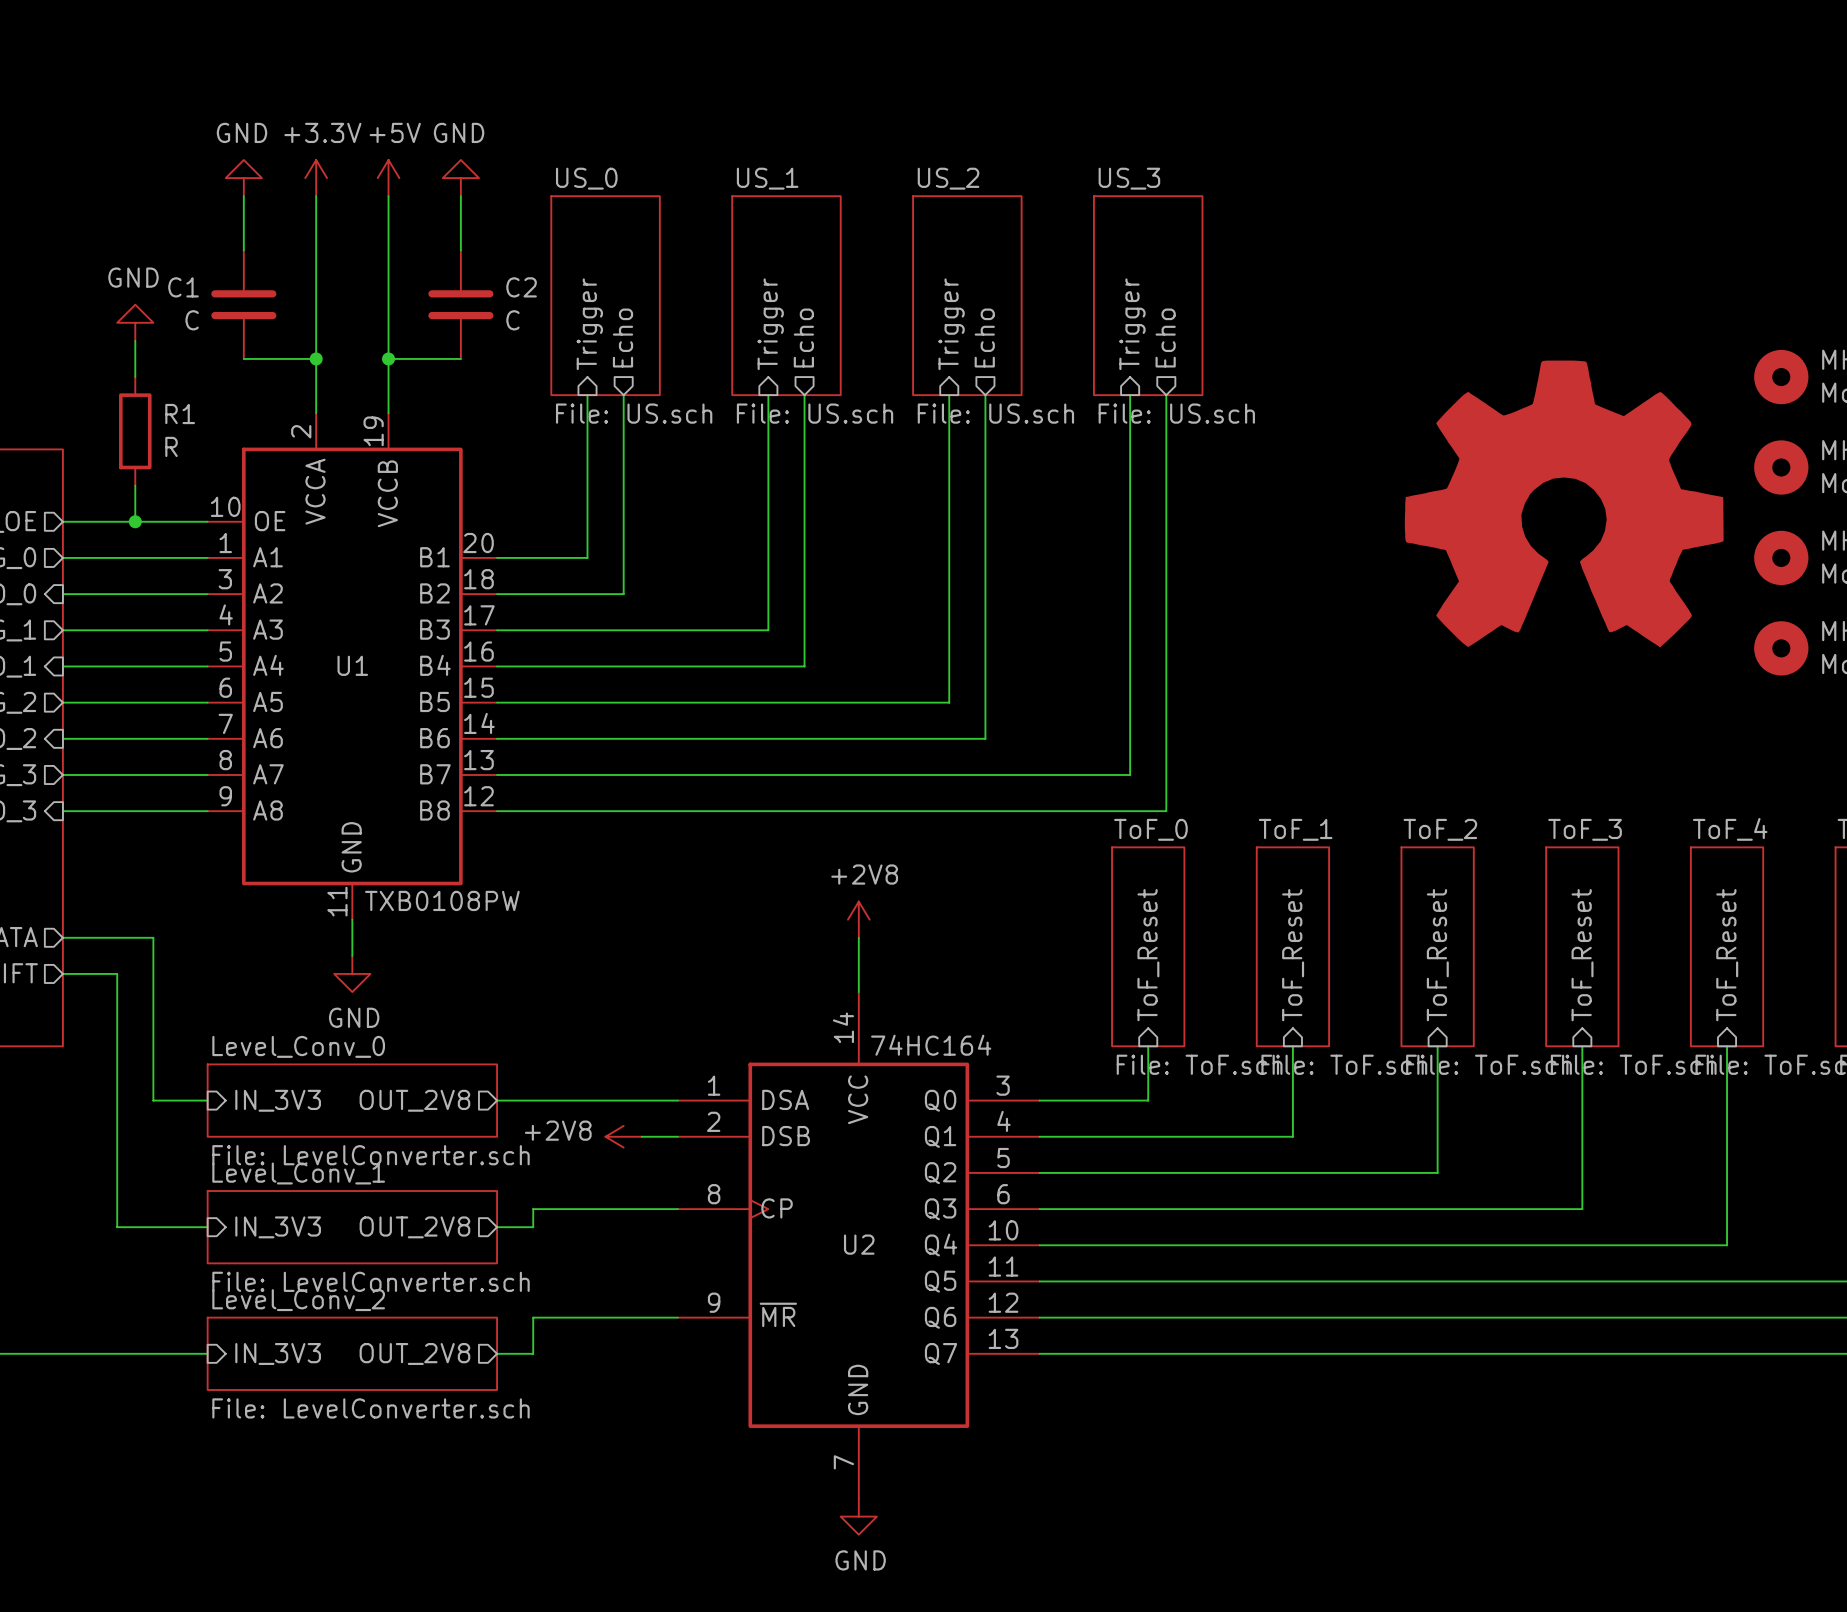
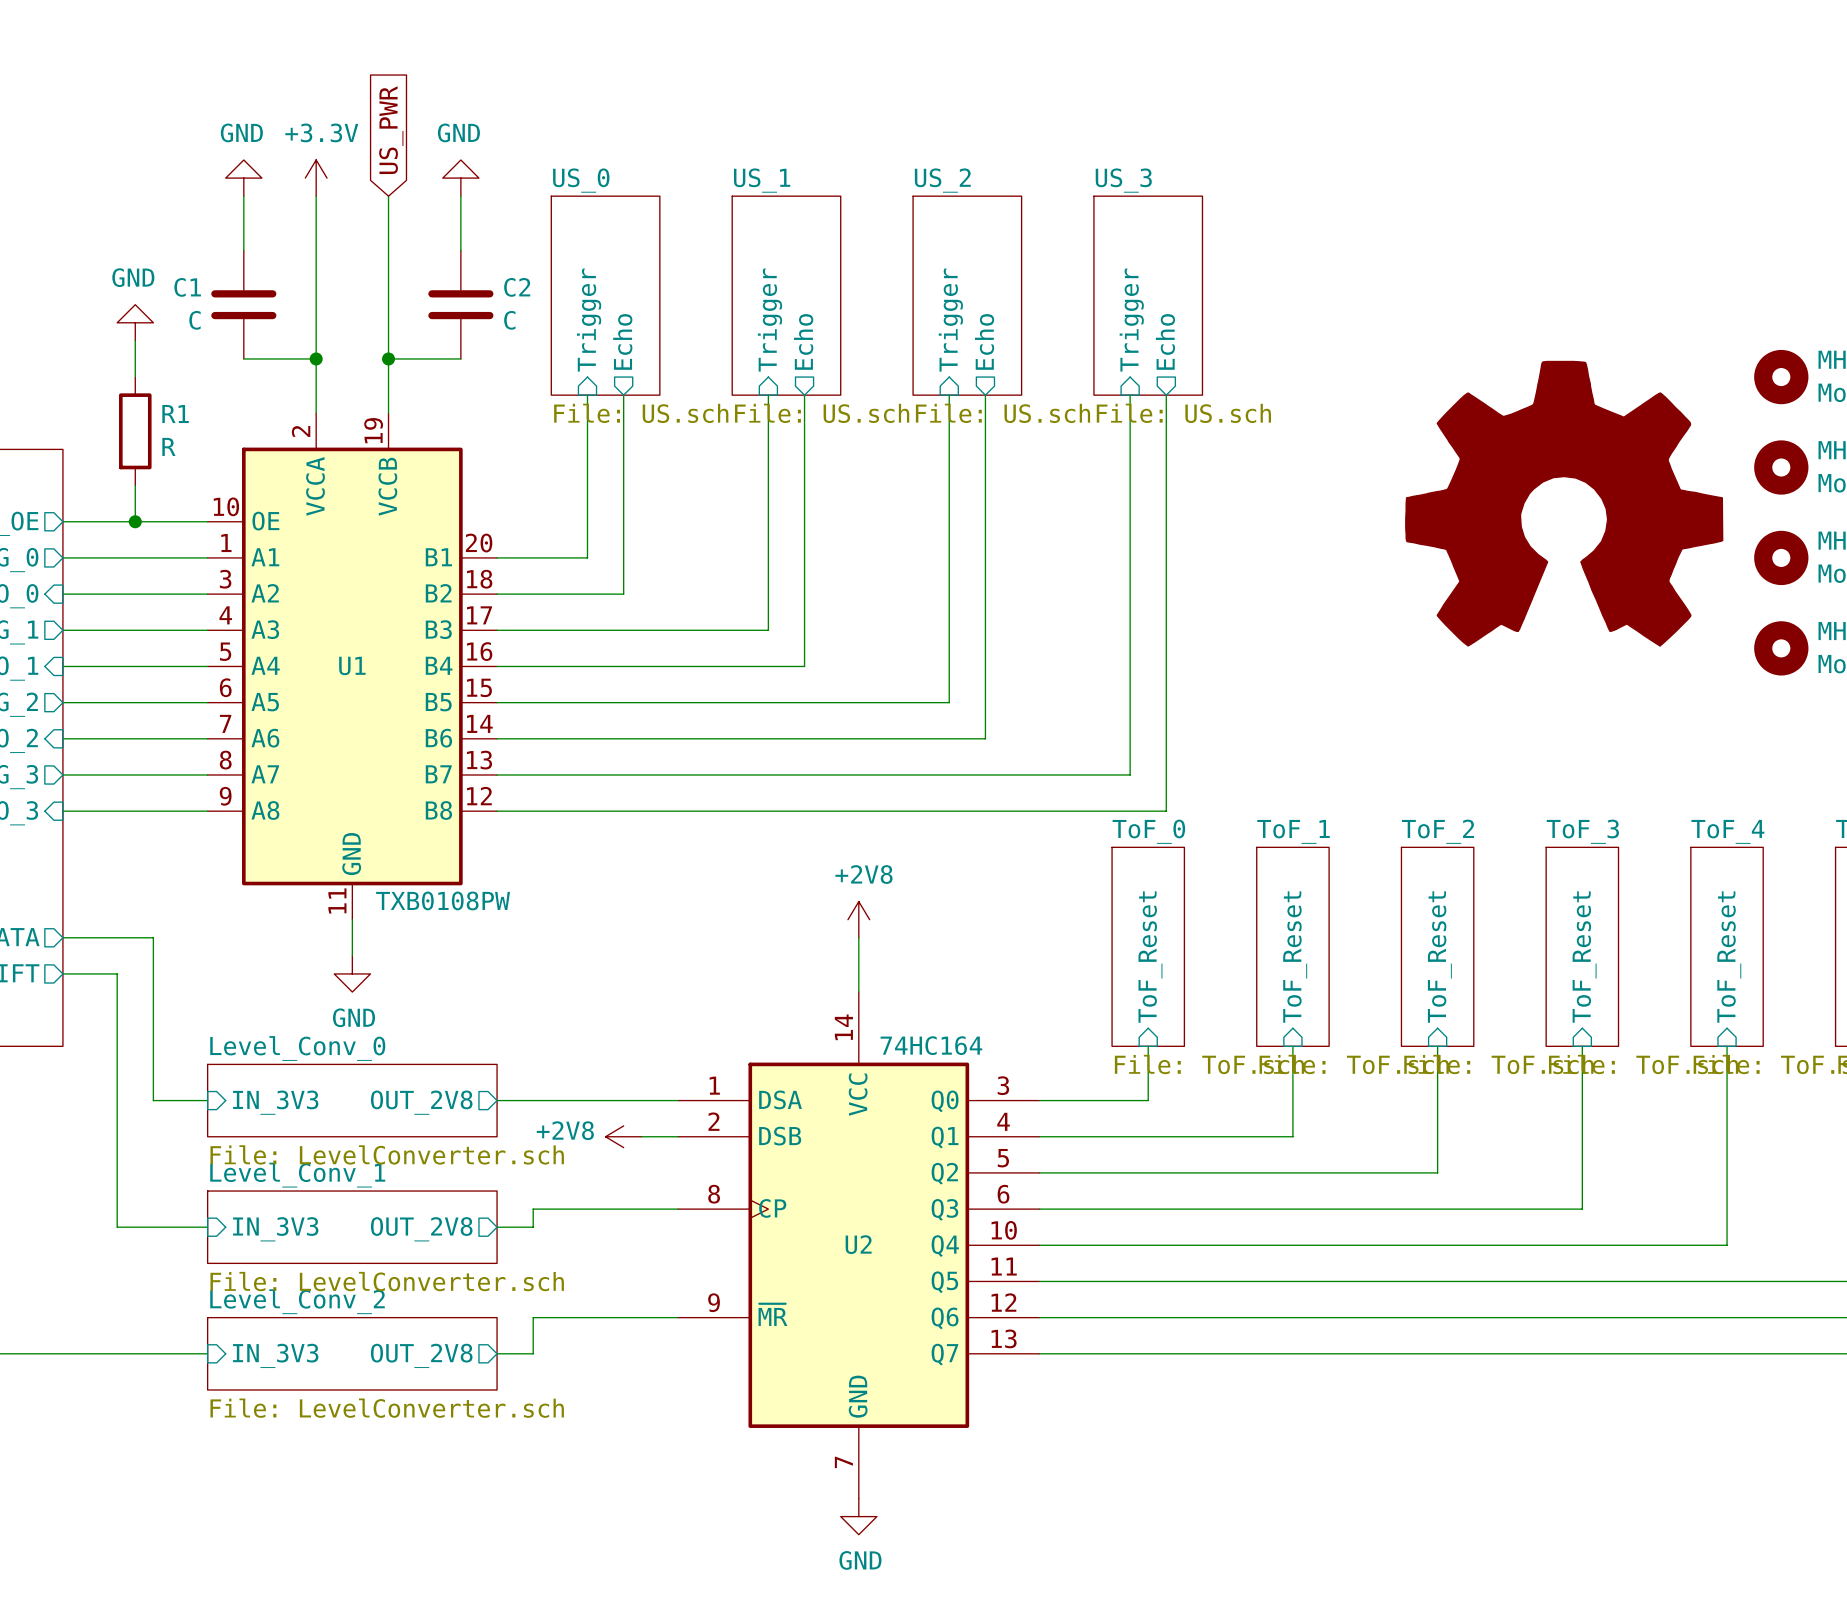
global label: none -> US_PWR (391, 130)
power symbol: +5V (388, 178) -> none

